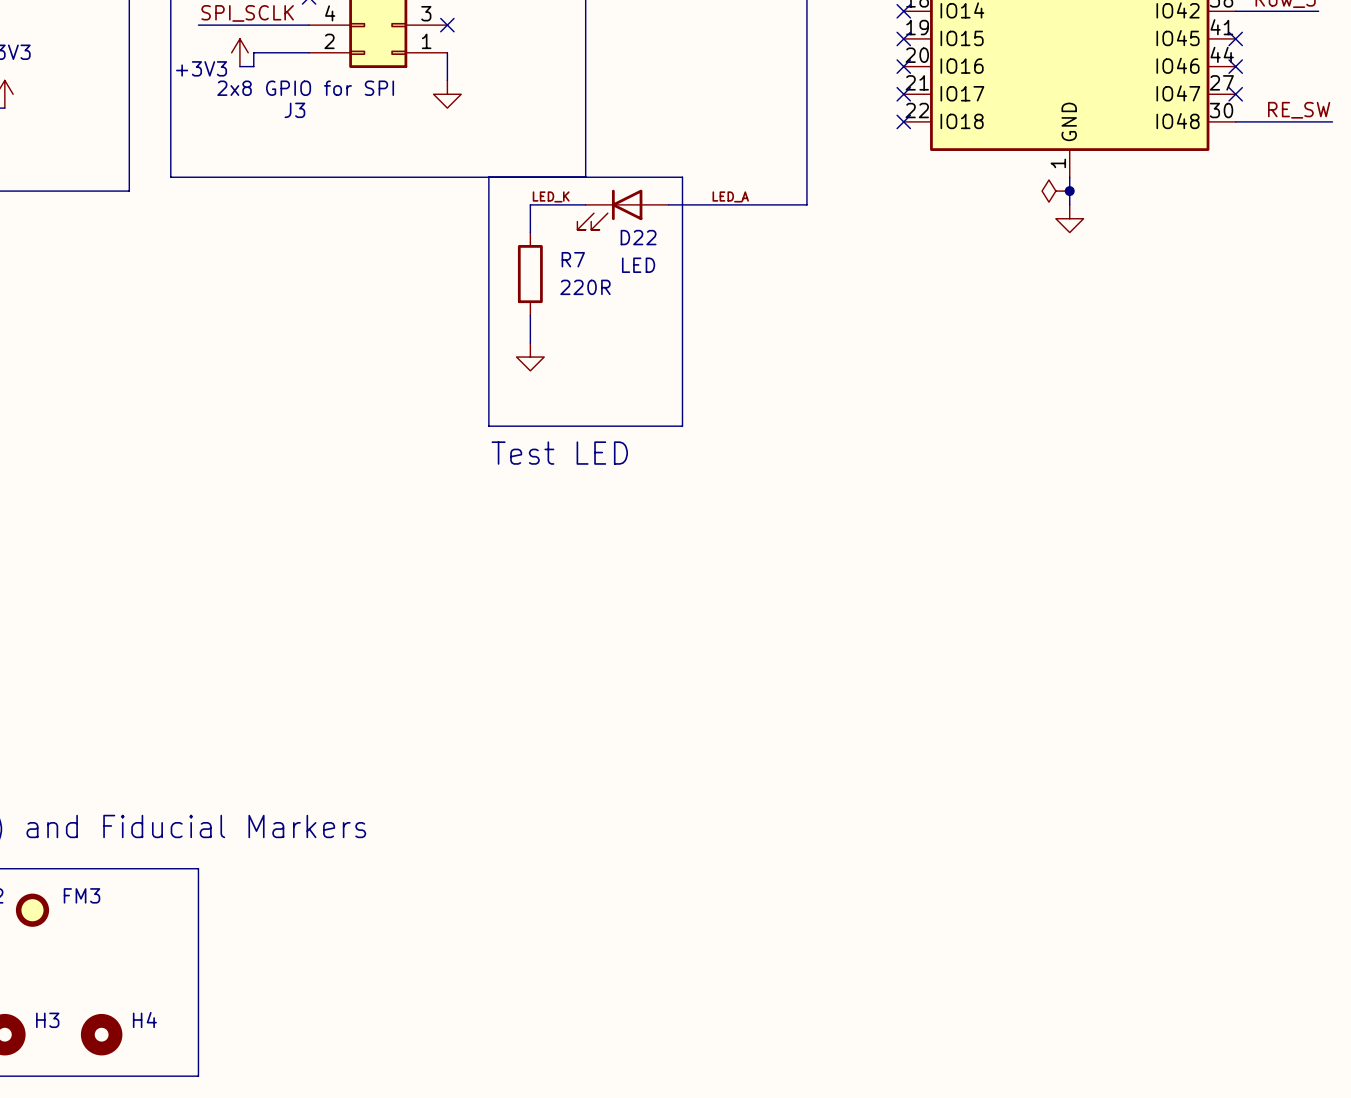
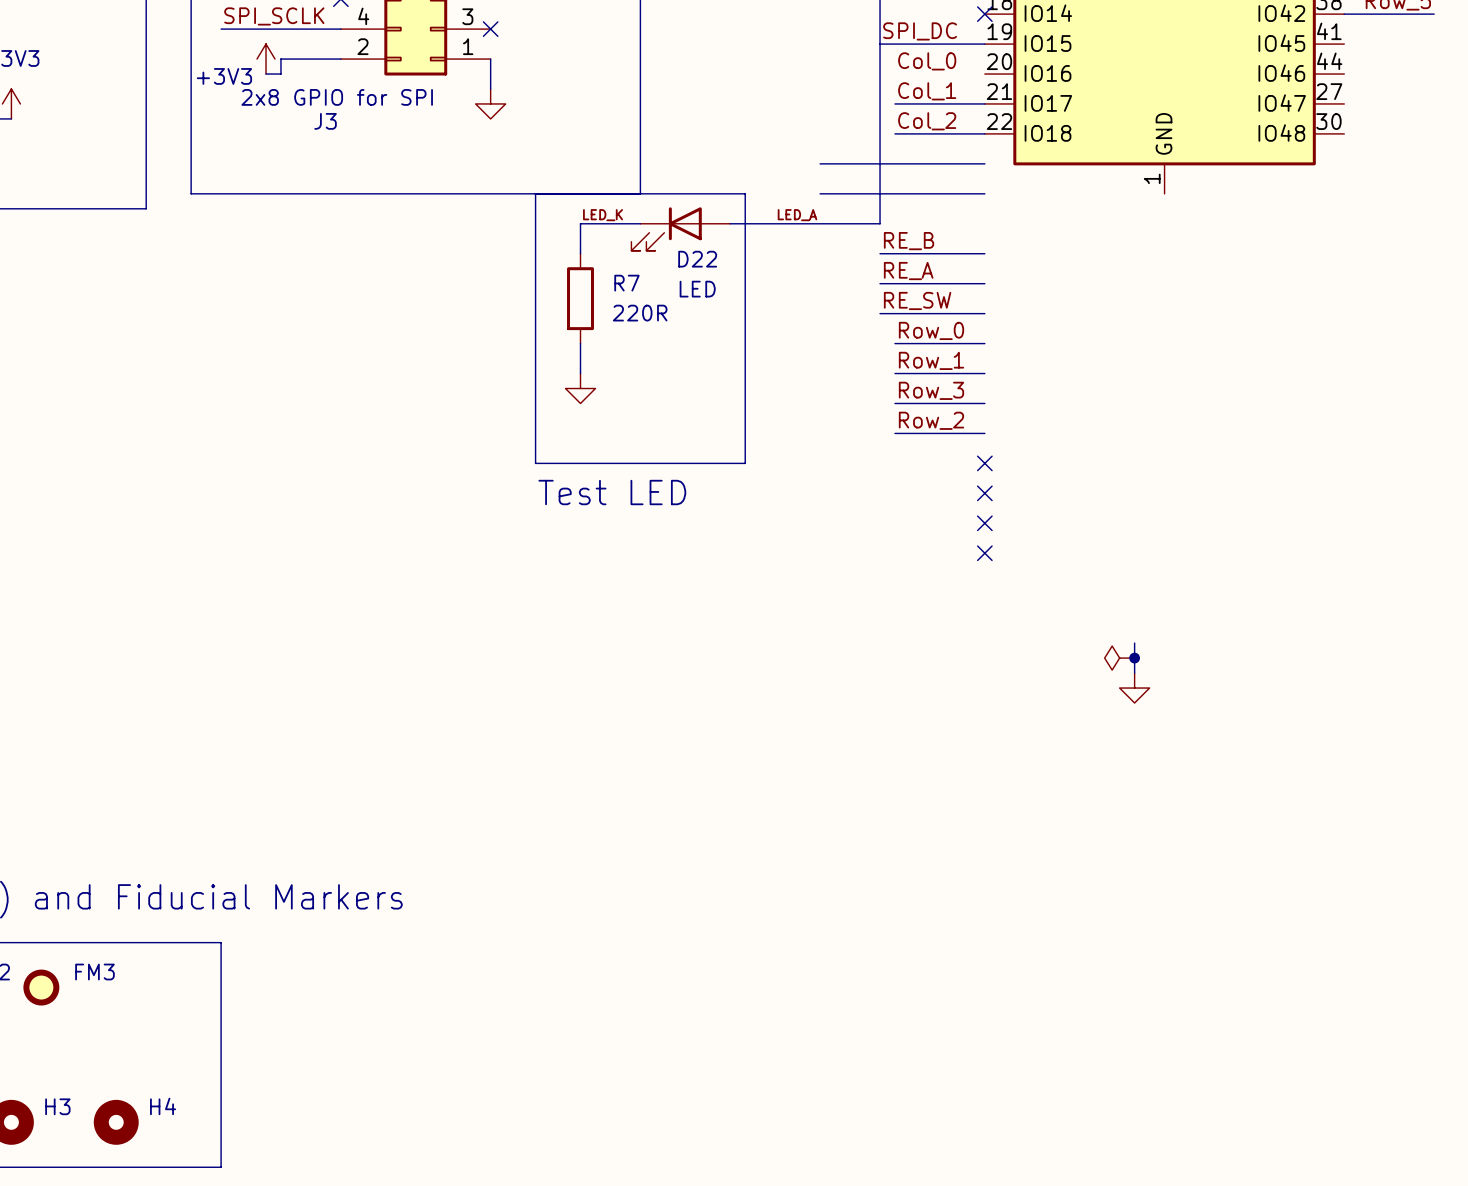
label: none -> SPI_DC (920, 31)
wire: none -> (880, 44) (984, 44)
no-connect mark: (903, 38) -> none
no-connect mark: (1235, 38) -> none
label: none -> Col_0 (927, 61)
no-connect mark: (903, 66) -> none
no-connect mark: (1235, 66) -> none
label: none -> Col_1 (927, 91)
wire: none -> (894, 103) (984, 103)
no-connect mark: (903, 94) -> none
no-connect mark: (1235, 94) -> none
label: none -> Col_2 (927, 121)
label: RE_SW (1299, 110) -> none
wire: none -> (894, 133) (984, 133)
no-connect mark: (903, 121) -> none
wire: (1235, 121) (1332, 121) -> none
wire: none -> (820, 163) (984, 163)
wire: none -> (820, 193) (984, 193)
wire: (1069, 177) (1069, 204) -> none
power symbol: (1055, 191) -> none
junction: (1069, 191) -> none
power symbol: (1069, 218) -> none
label: none -> RE_B (909, 241)
wire: none -> (880, 253) (984, 253)
label: none -> RE_A (908, 271)
wire: none -> (880, 283) (984, 283)
label: none -> RE_SW (917, 300)
wire: none -> (880, 313) (984, 313)
label: none -> Row_0 (931, 330)
wire: none -> (894, 343) (984, 343)
label: none -> Row_1 (931, 360)
wire: none -> (894, 373) (984, 373)
label: none -> Row_3 (931, 390)
wire: none -> (894, 403) (984, 403)
label: none -> Row_2 (931, 420)
wire: none -> (894, 433) (984, 433)
no-connect mark: none -> (984, 463)
no-connect mark: none -> (984, 493)
no-connect mark: none -> (984, 523)
no-connect mark: none -> (984, 553)
wire: none -> (1134, 643) (1134, 673)
power symbol: none -> (1119, 658)
junction: none -> (1134, 658)
power symbol: none -> (1134, 688)

